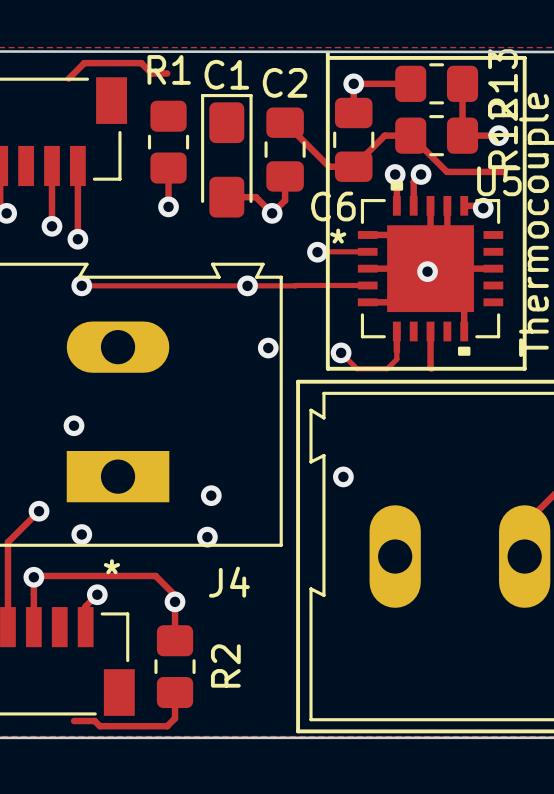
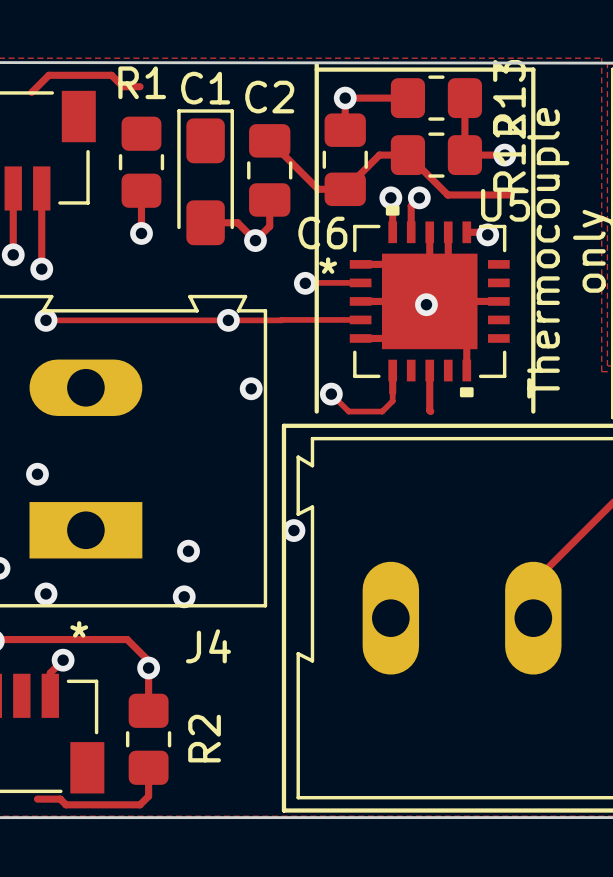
line: (327, 368) (524, 368) -> none
via position: (343, 476) -> (293, 530)

